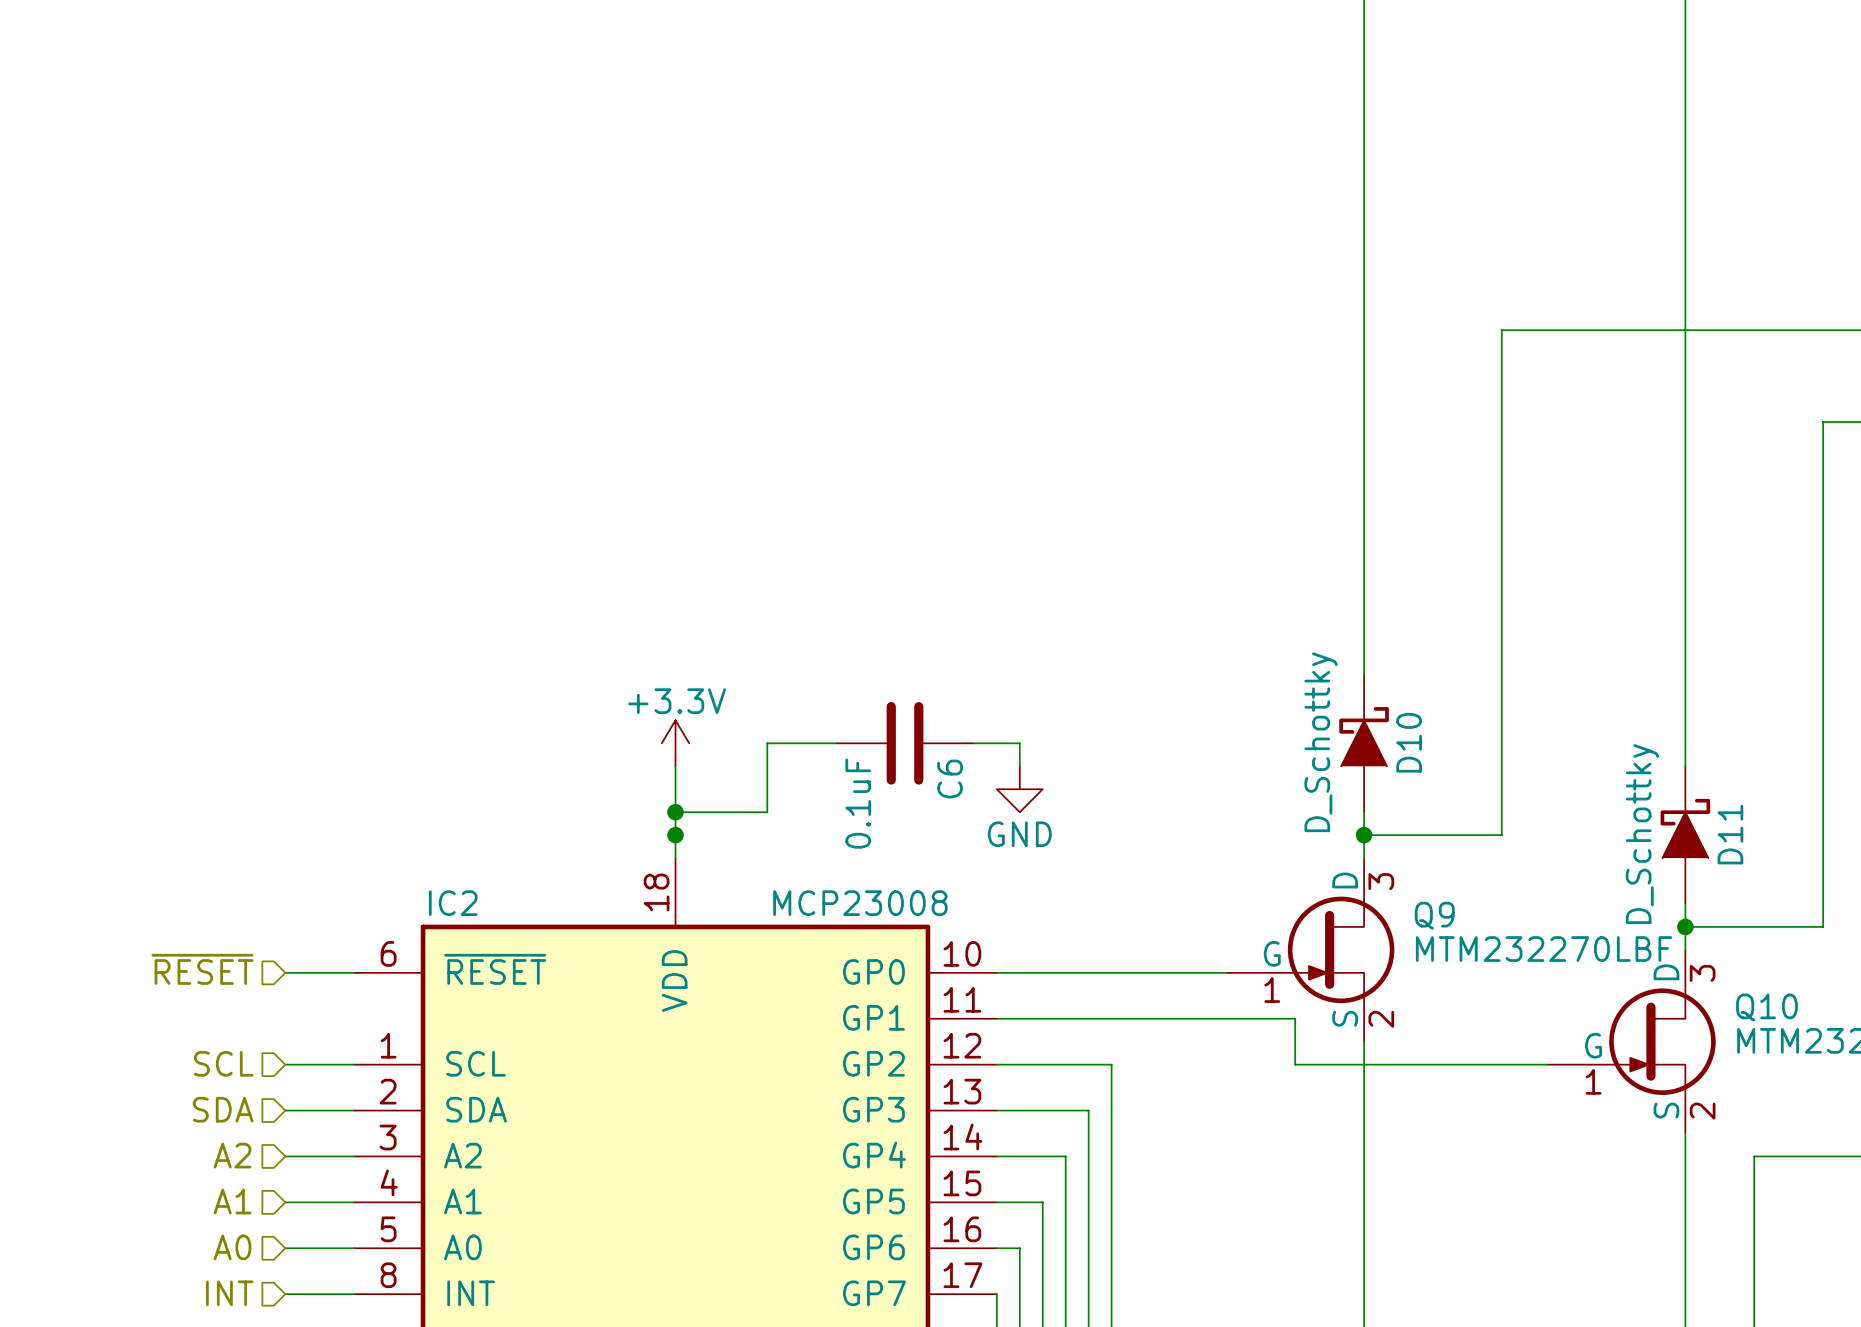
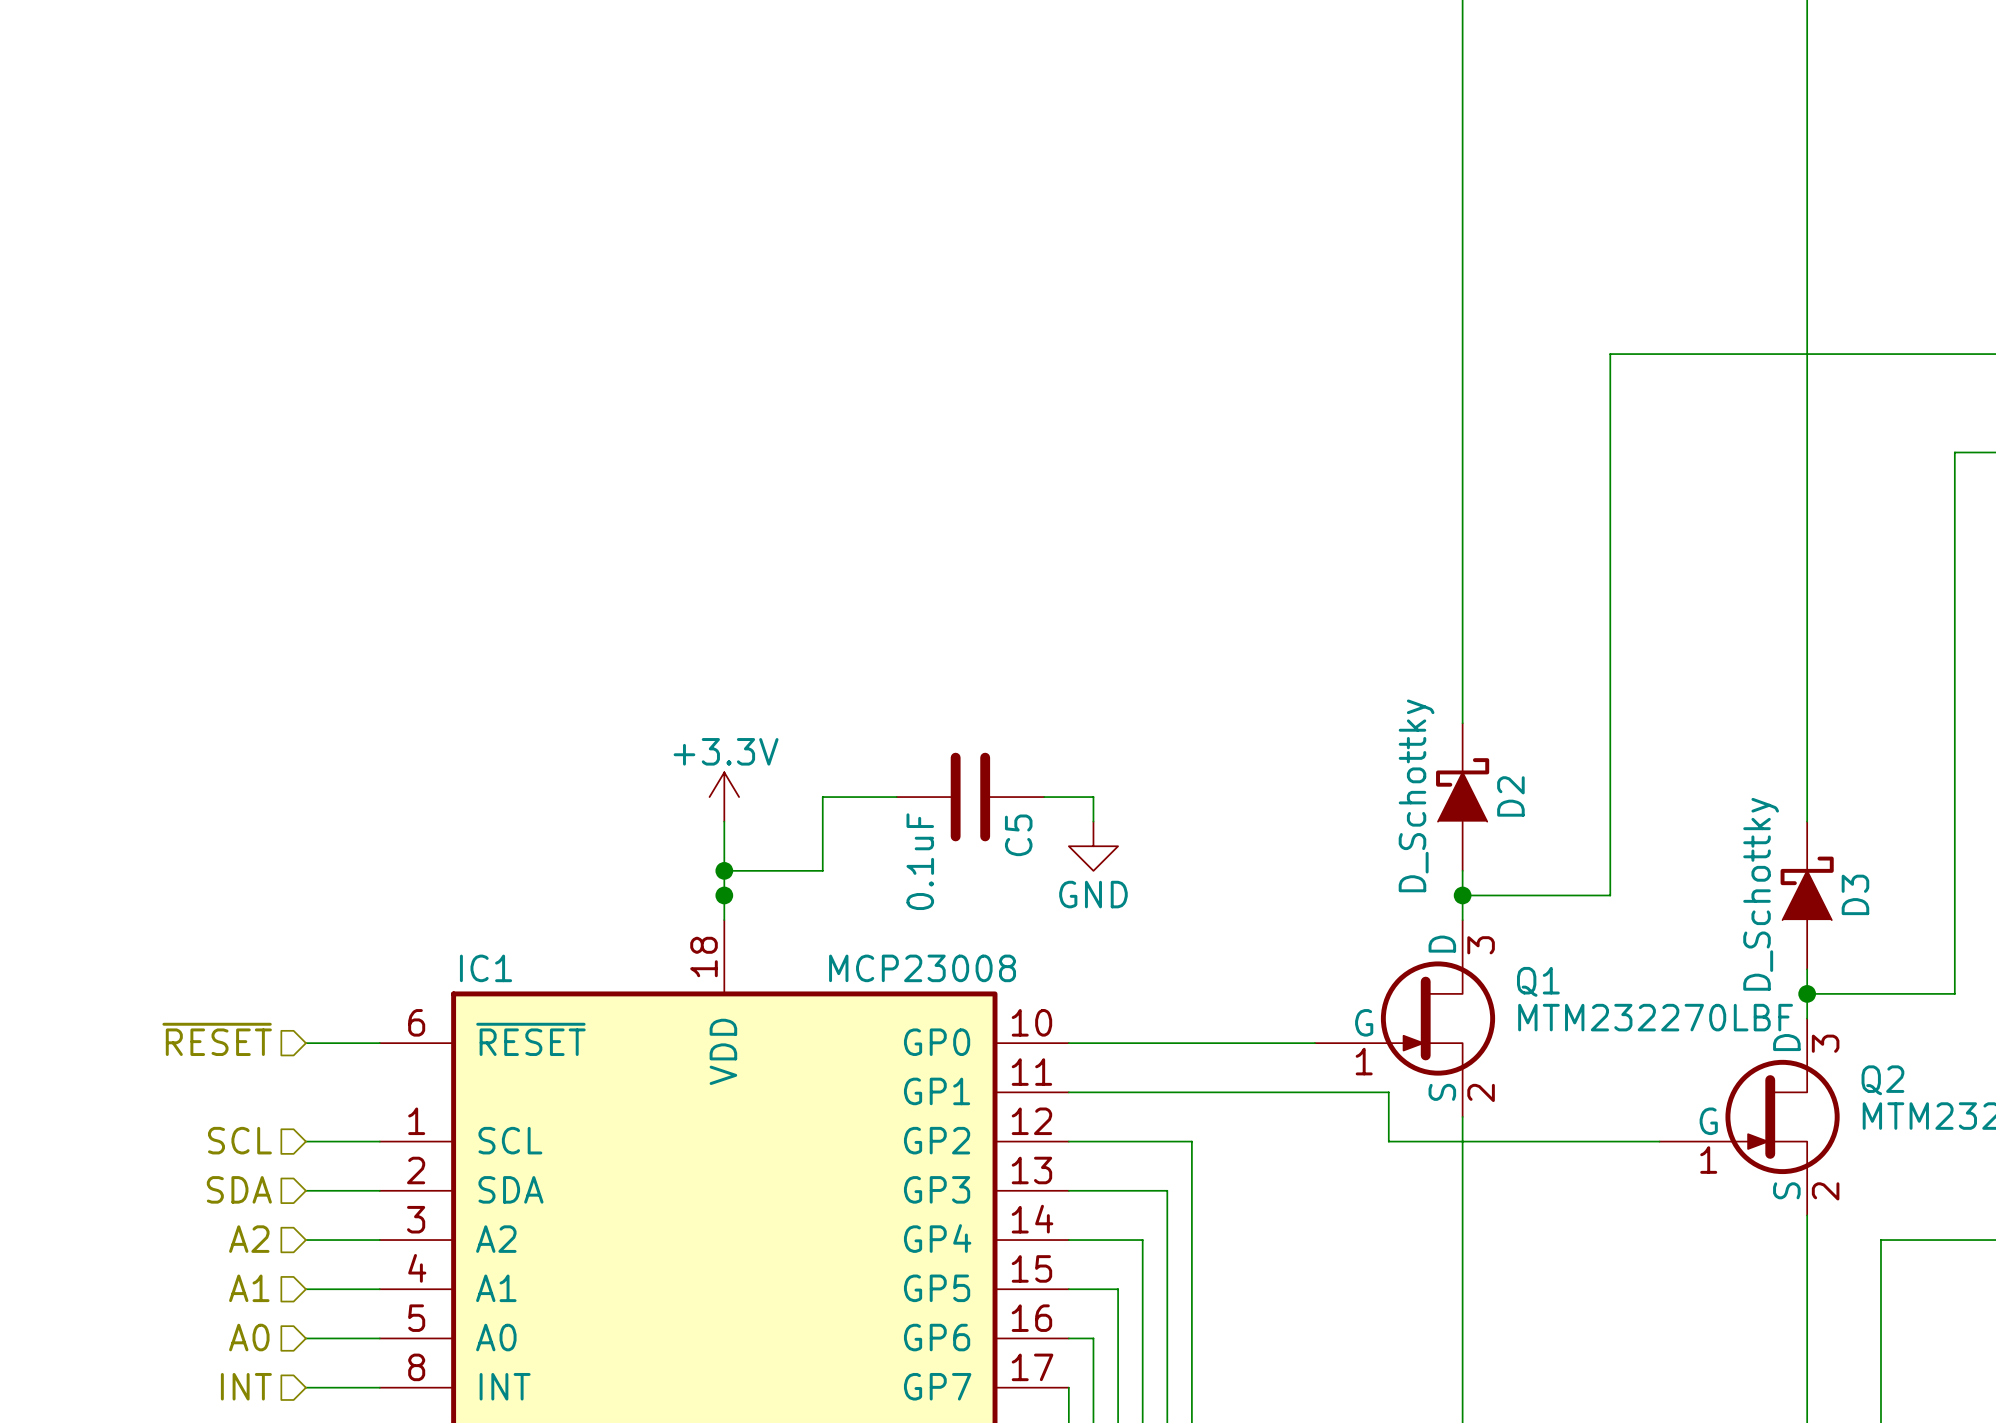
D10 name: D10 (1409, 742) -> D2 (1510, 796)
C6 name: C6 (950, 779) -> C5 (1018, 835)
D11 name: D11 (1730, 834) -> D3 (1855, 894)
IC2 name: IC2 (453, 903) -> IC1 (486, 968)
Q9 name: Q9 (1434, 915) -> Q1 (1538, 981)
Q10 name: Q10 (1766, 1007) -> Q2 (1882, 1080)

